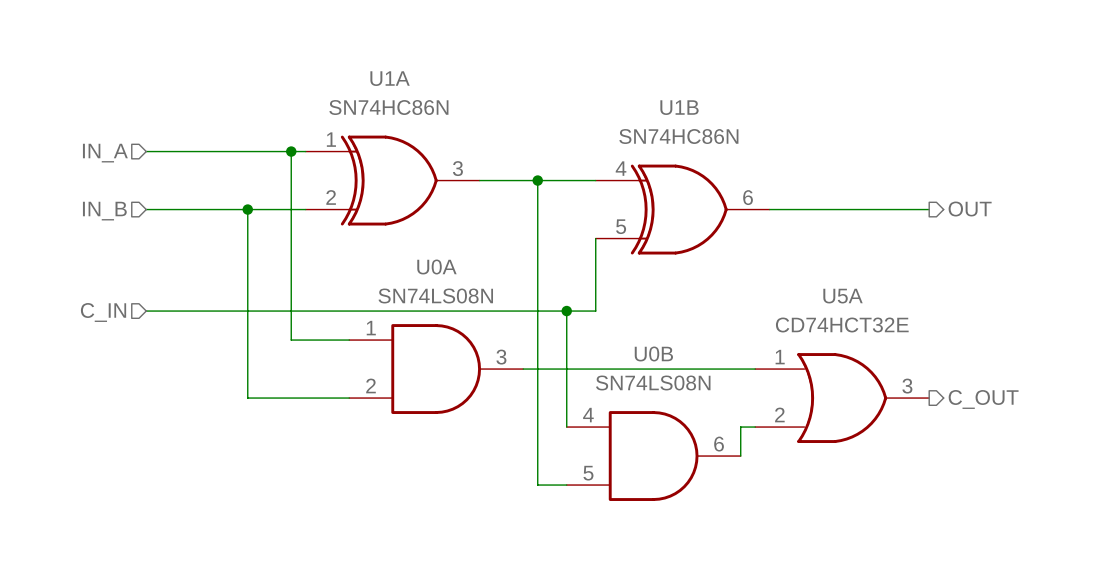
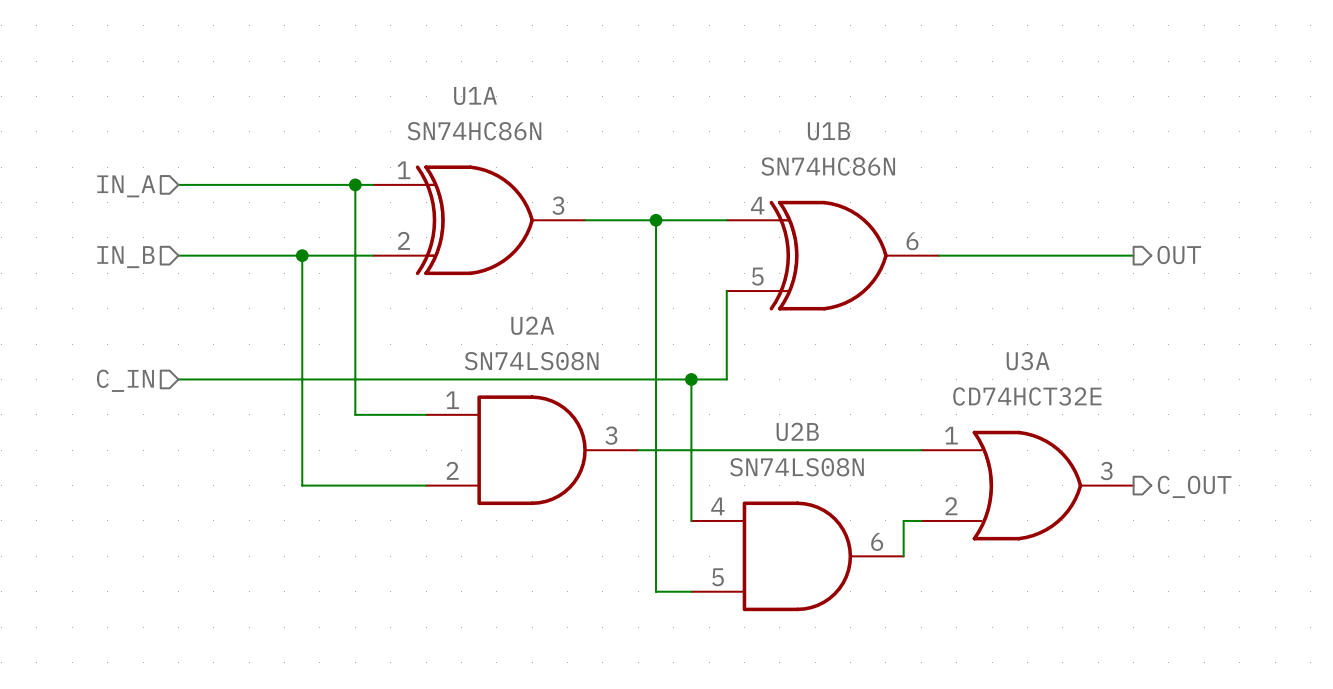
U0A name: U0A (436, 267) -> U2A (532, 325)
U5A name: U5A (843, 296) -> U3A (1028, 361)
U0B name: U0B (653, 353) -> U2B (797, 431)

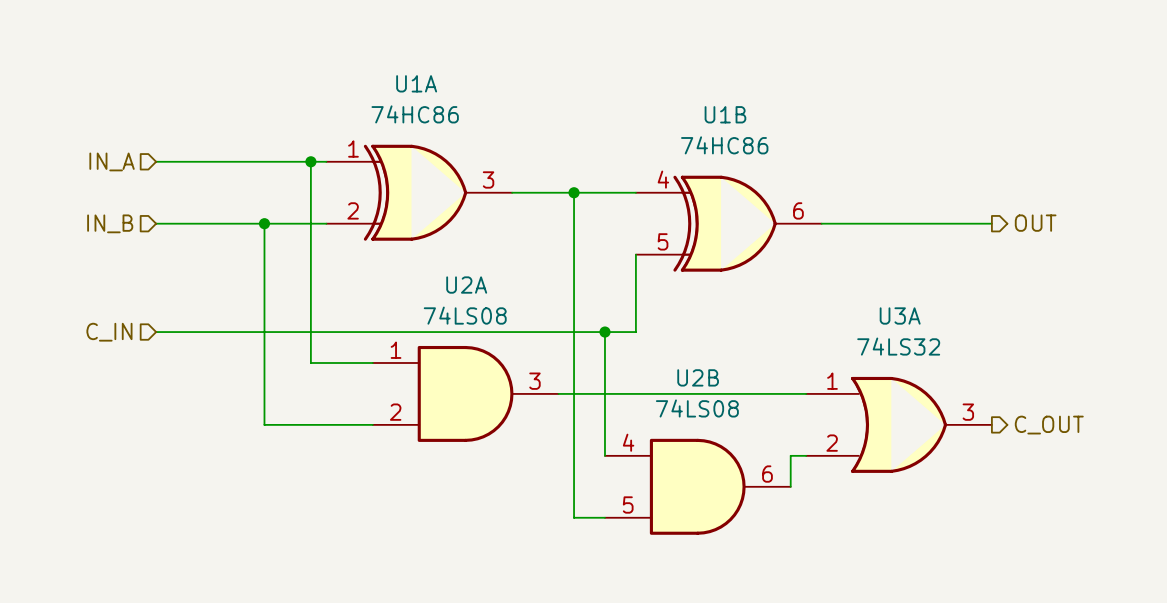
U1A value: SN74HC86N (474, 131) -> 74HC86 (415, 114)
U1B value: SN74HC86N (828, 166) -> 74HC86 (724, 145)
U2A value: SN74LS08N (531, 361) -> 74LS08 (465, 315)
U3A value: CD74HCT32E (1027, 396) -> 74LS32 (898, 346)
U2B value: SN74LS08N (796, 467) -> 74LS08 (697, 408)

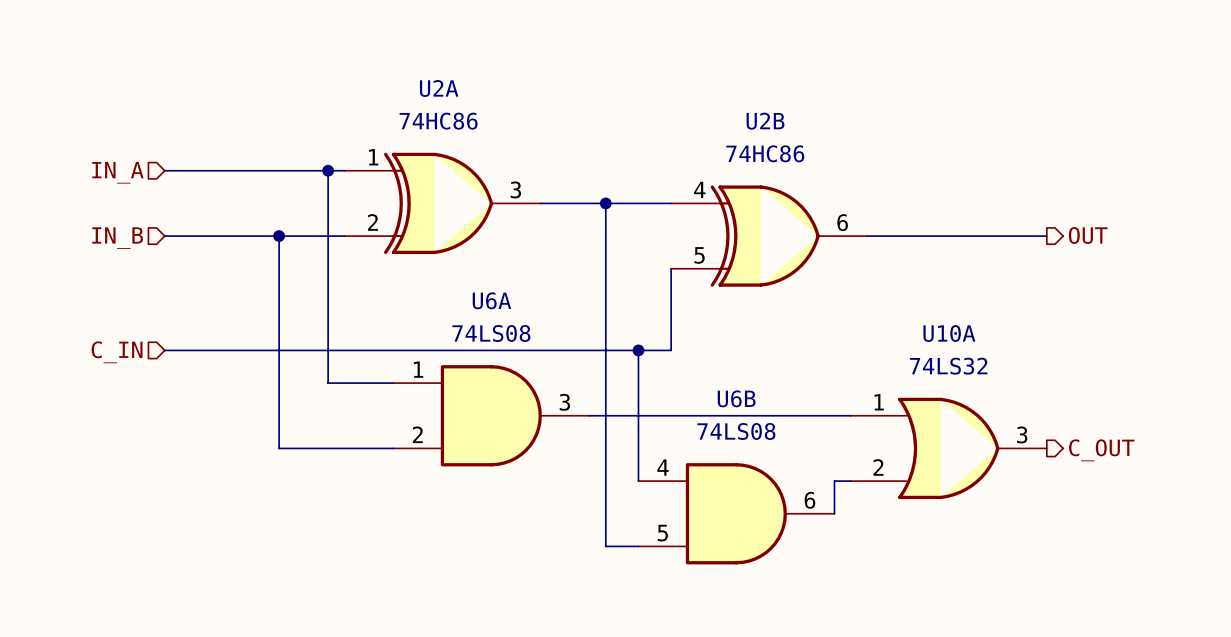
U1A name: U1A (416, 83) -> U2A (439, 88)
U1B name: U1B (725, 114) -> U2B (765, 121)
U2A name: U2A (466, 285) -> U6A (491, 300)
U3A name: U3A (900, 315) -> U10A (949, 333)
U2B name: U2B (698, 377) -> U6B (736, 398)

